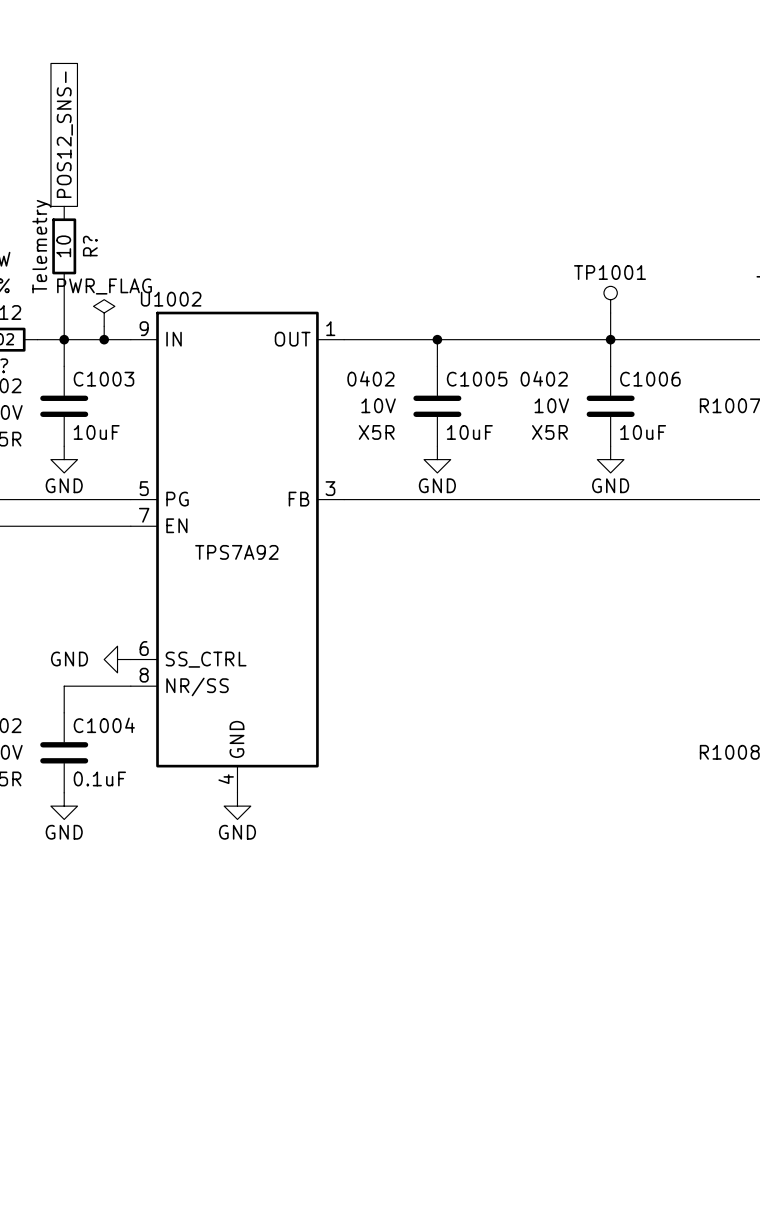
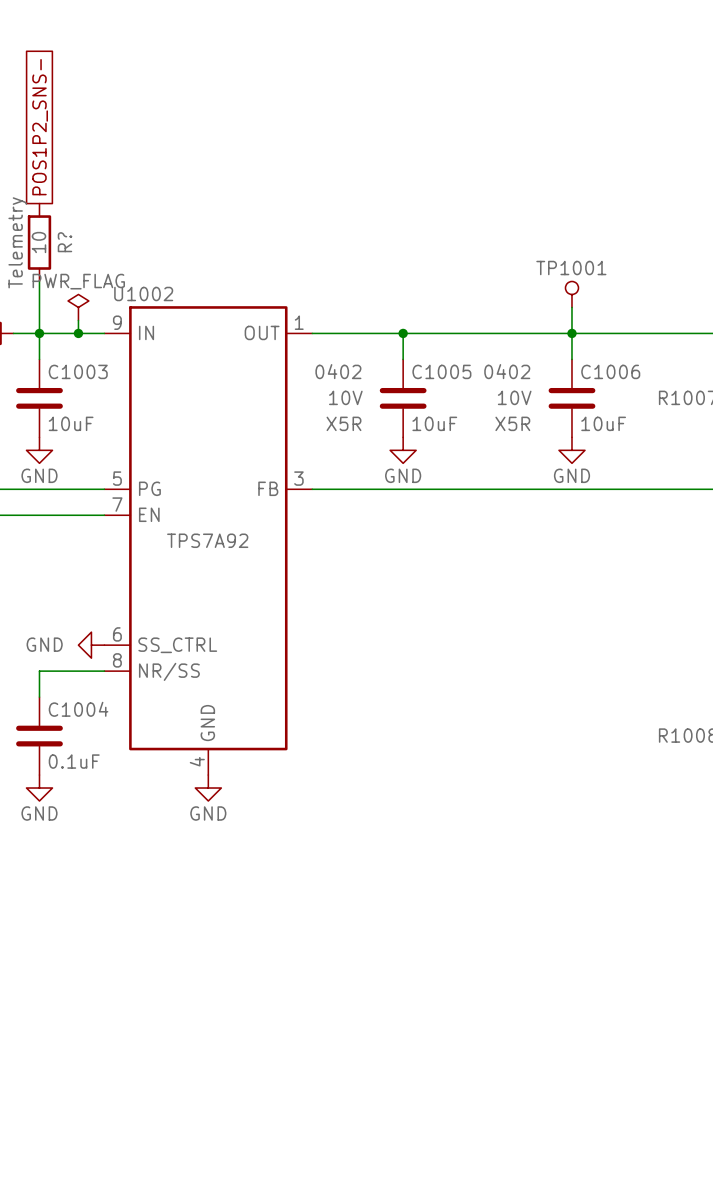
global label: POS12_SNS- (64, 134) -> POS1P2_SNS- (40, 127)

